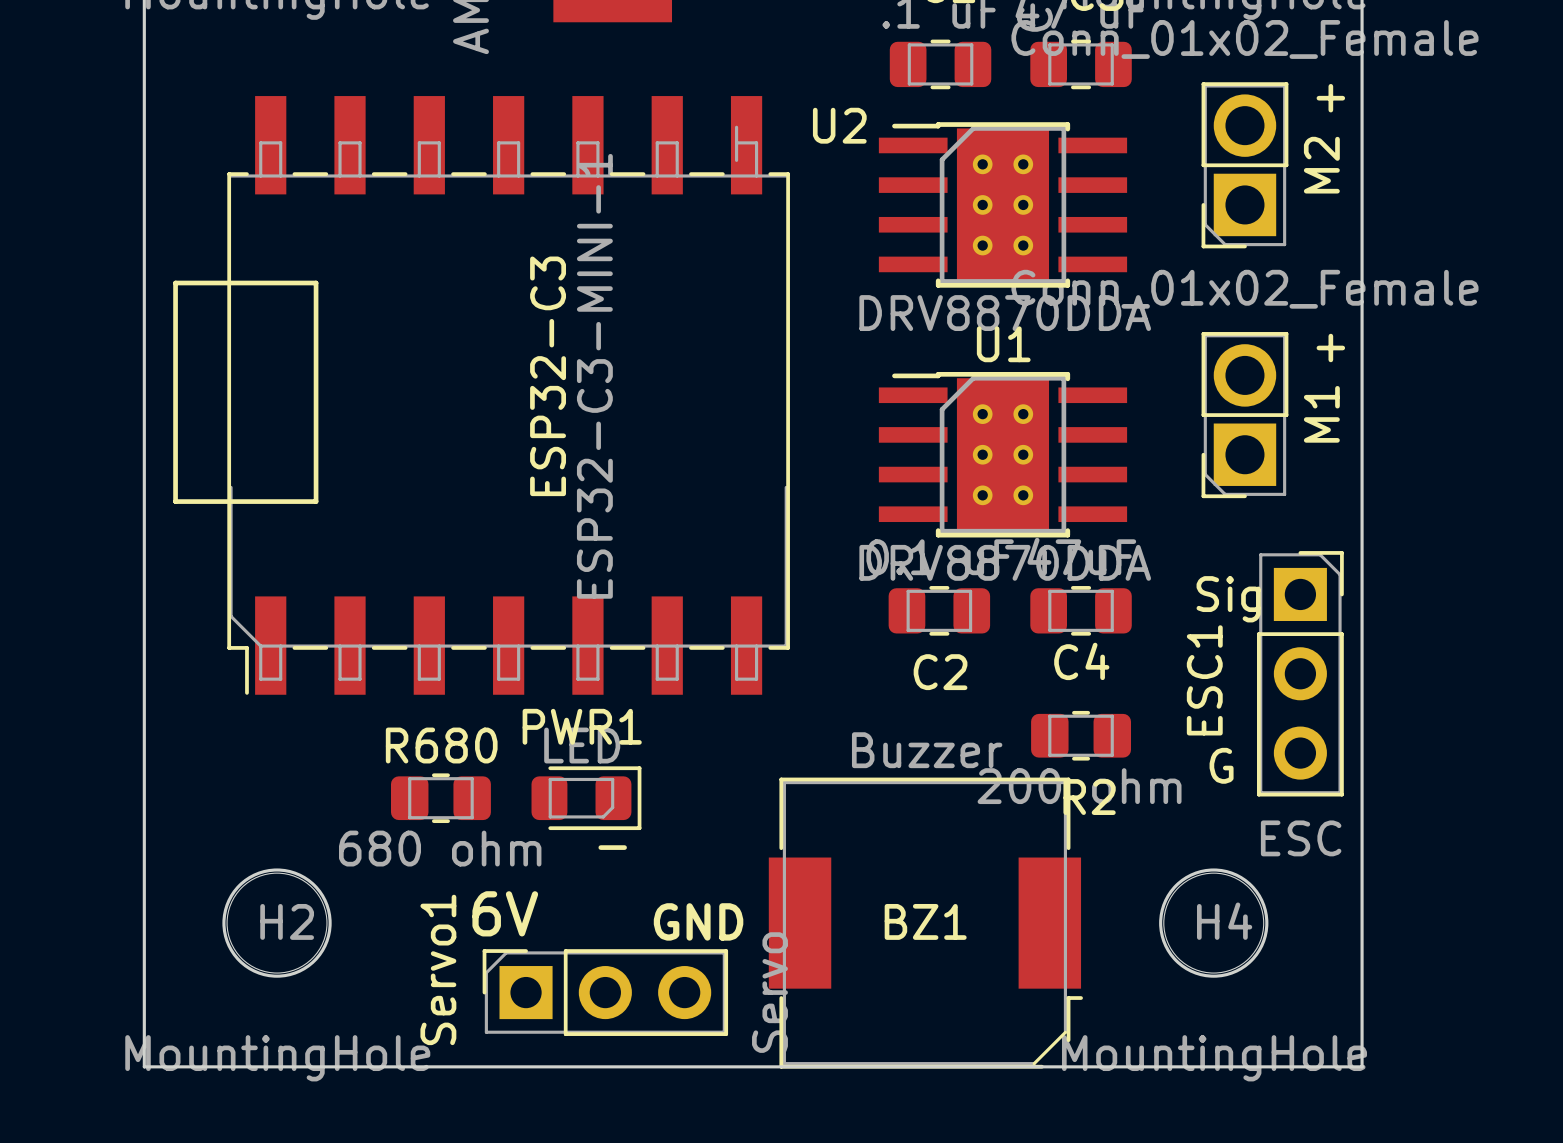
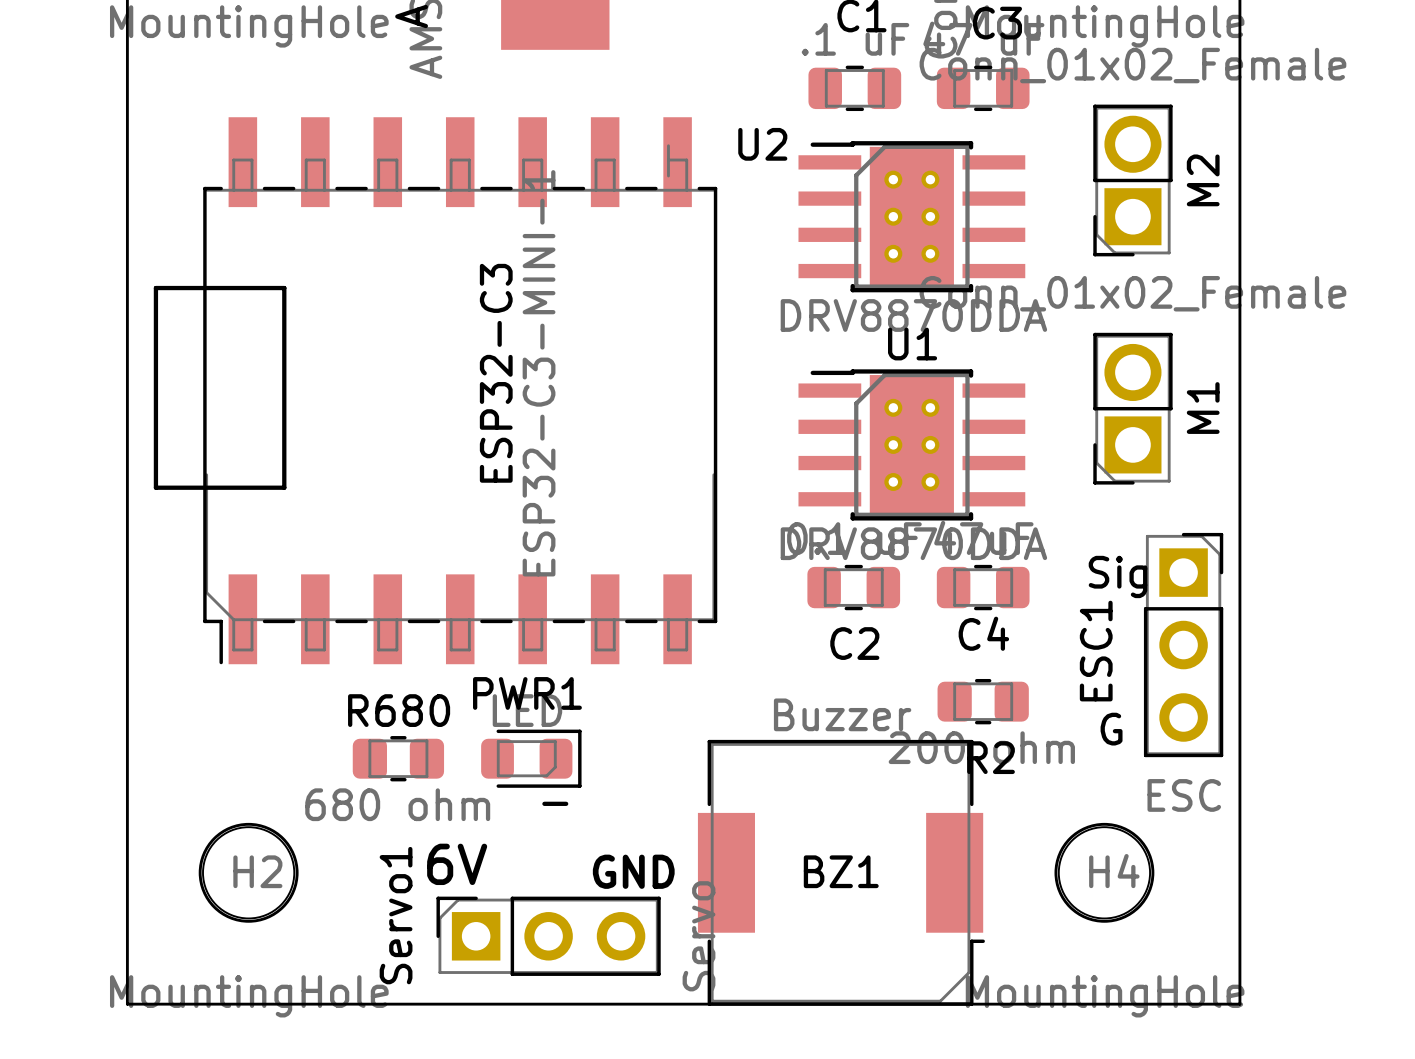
text: + (1330, 98) -> none
text: + (1330, 348) -> none
BZ1 footprint: [768, 777, 1083, 1069] -> [697, 739, 985, 1006]

